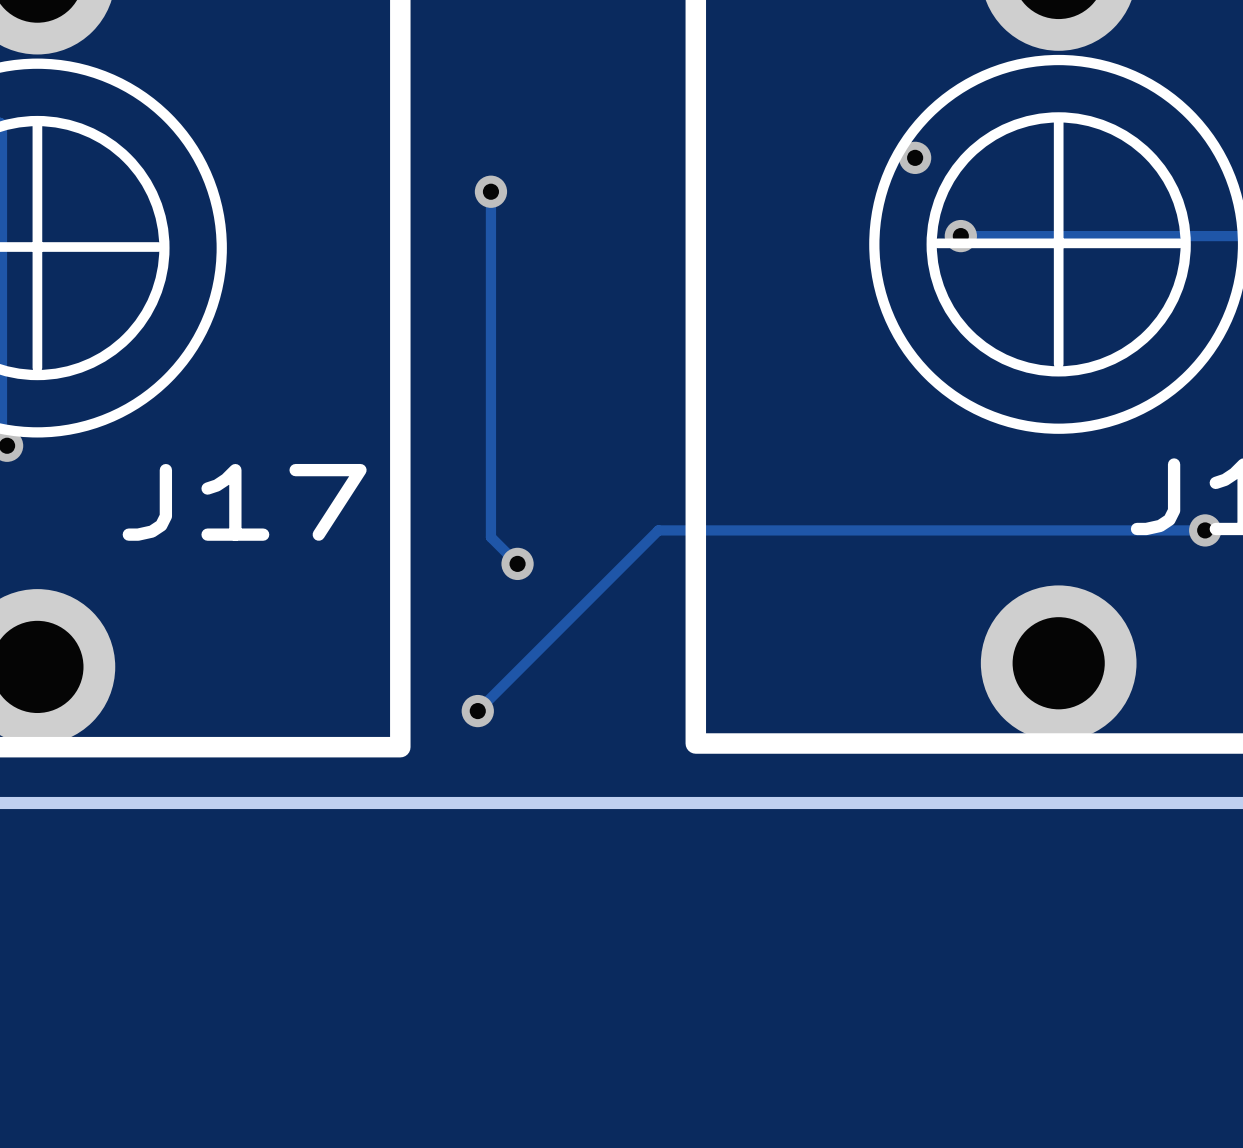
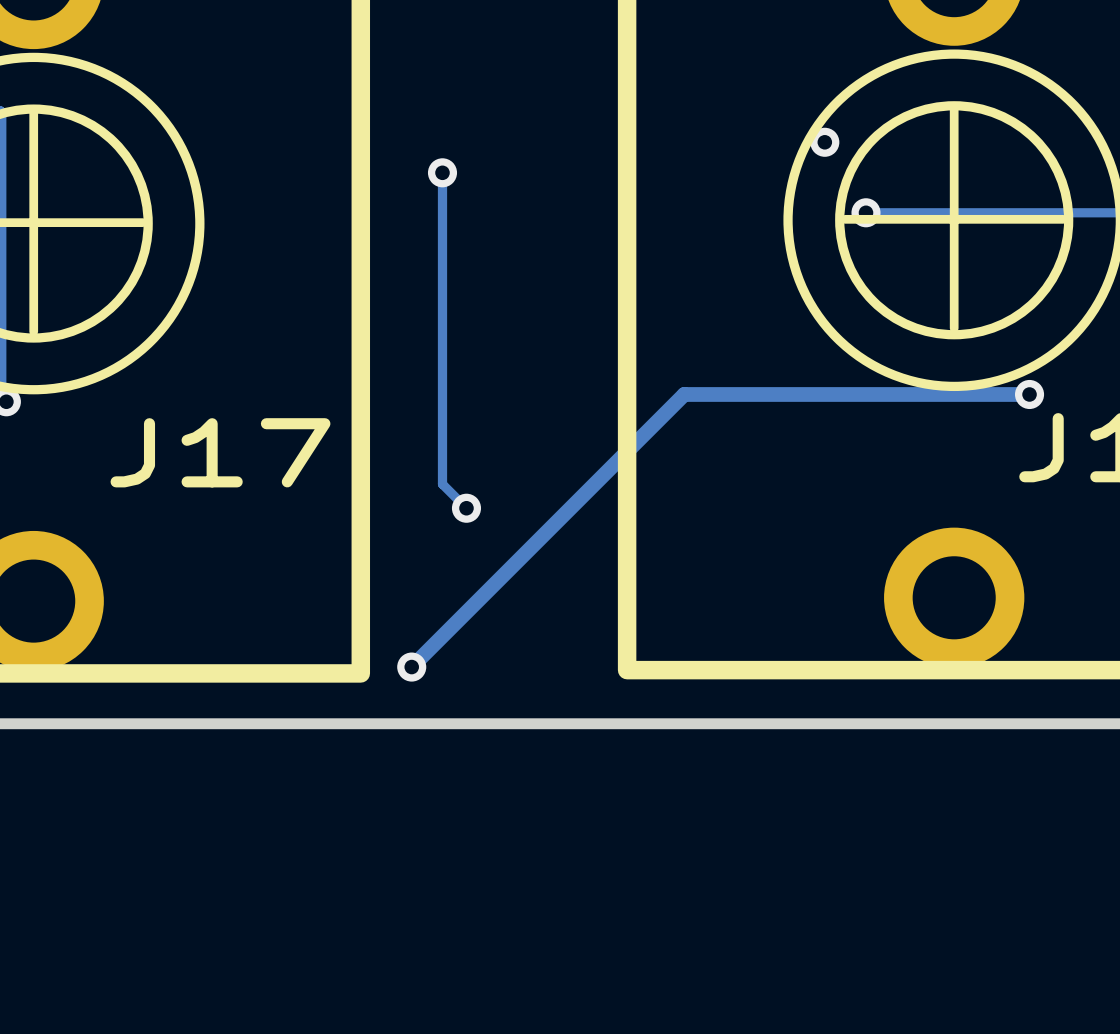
track: none -> (1029, 394) (684, 394) (411, 667)
track: (1205, 530) (658, 530) (477, 711) -> none
via position: (1205, 530) -> (1029, 394)
via position: (477, 711) -> (411, 667)

